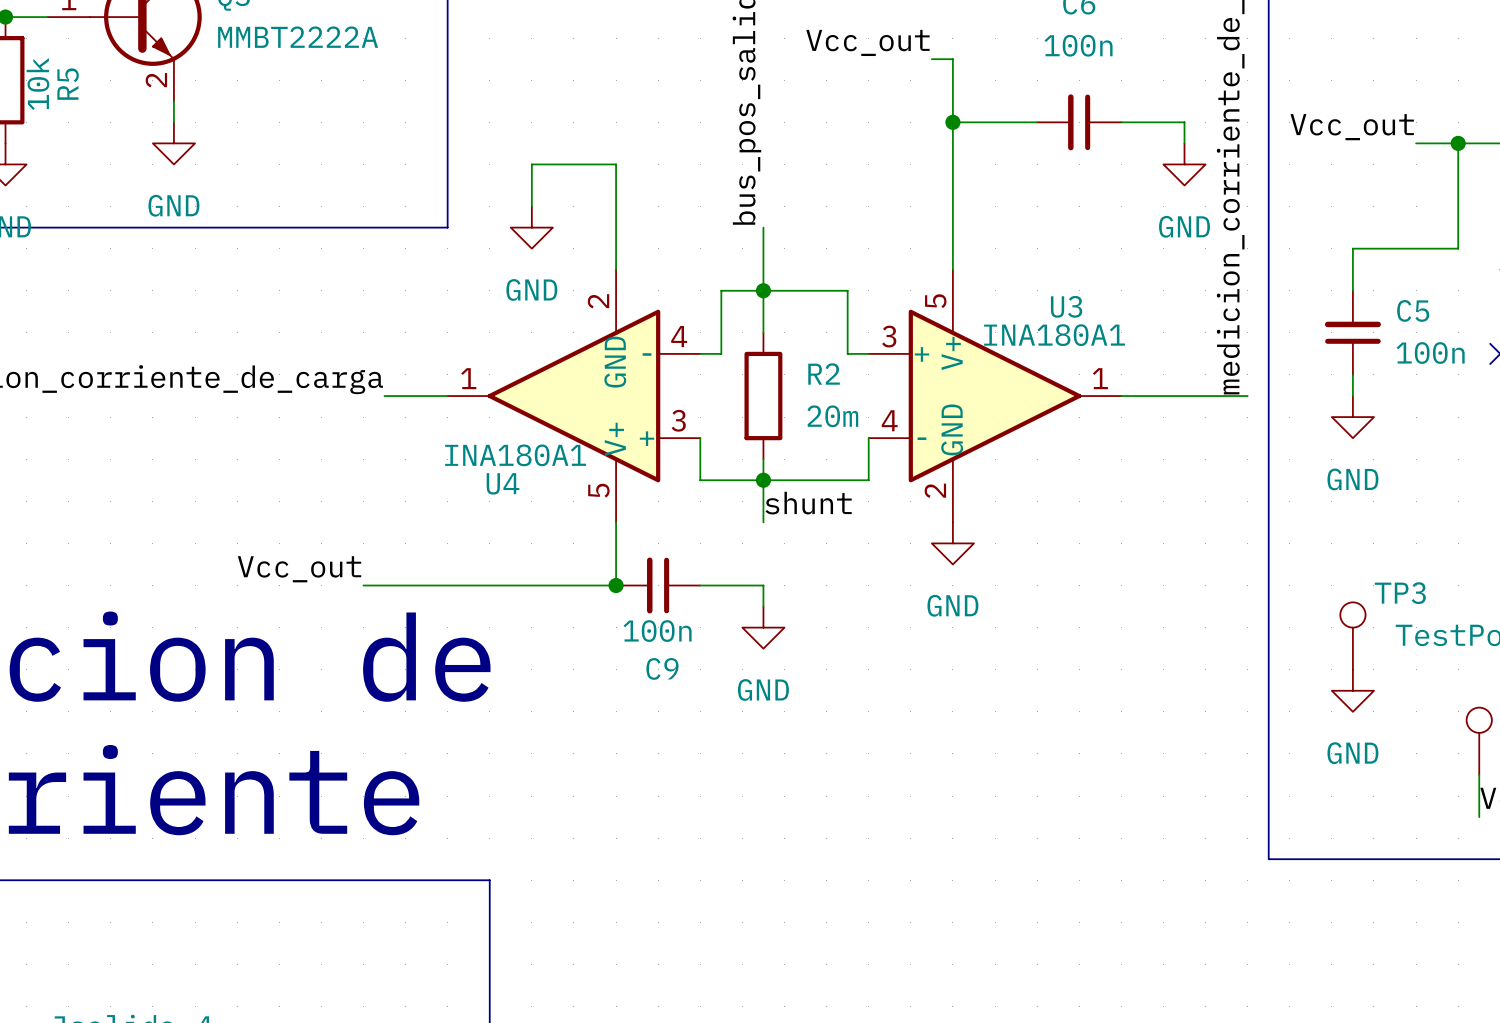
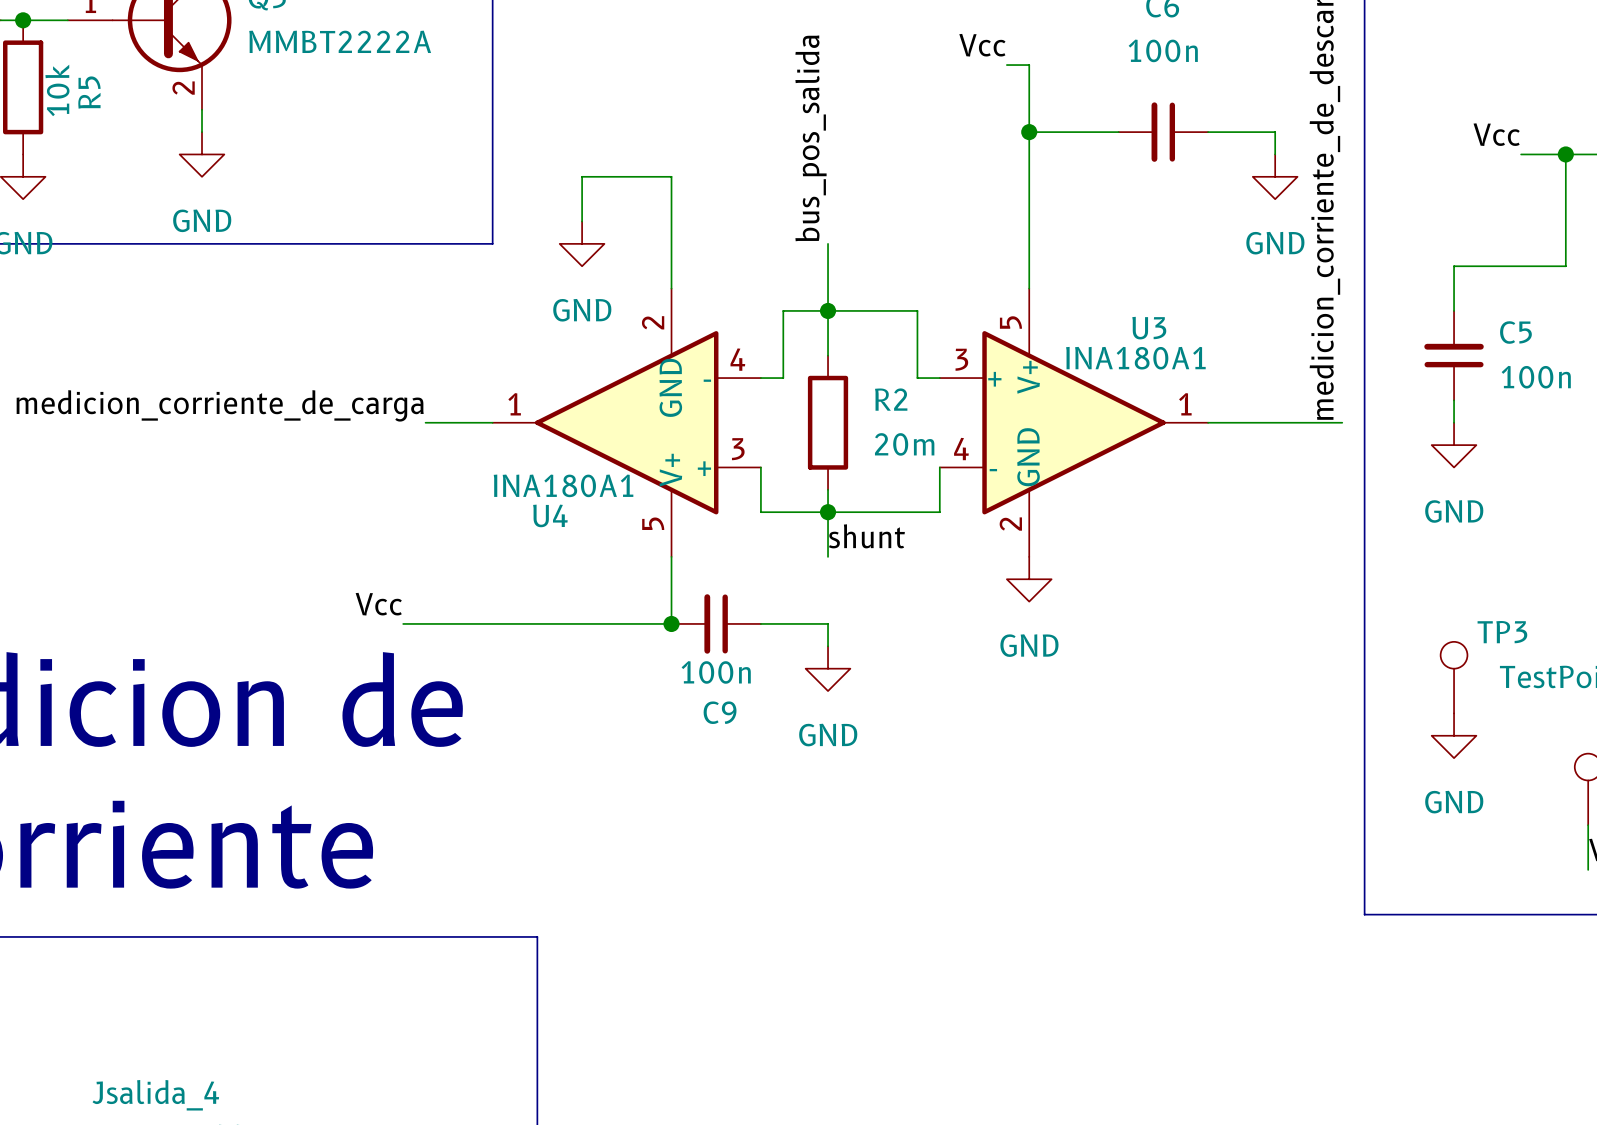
label: Vcc_out (867, 42) -> Vcc (982, 45)
label: Vcc_out (1352, 127) -> Vcc (1496, 134)
label: Vcc_out (299, 569) -> Vcc (378, 604)

